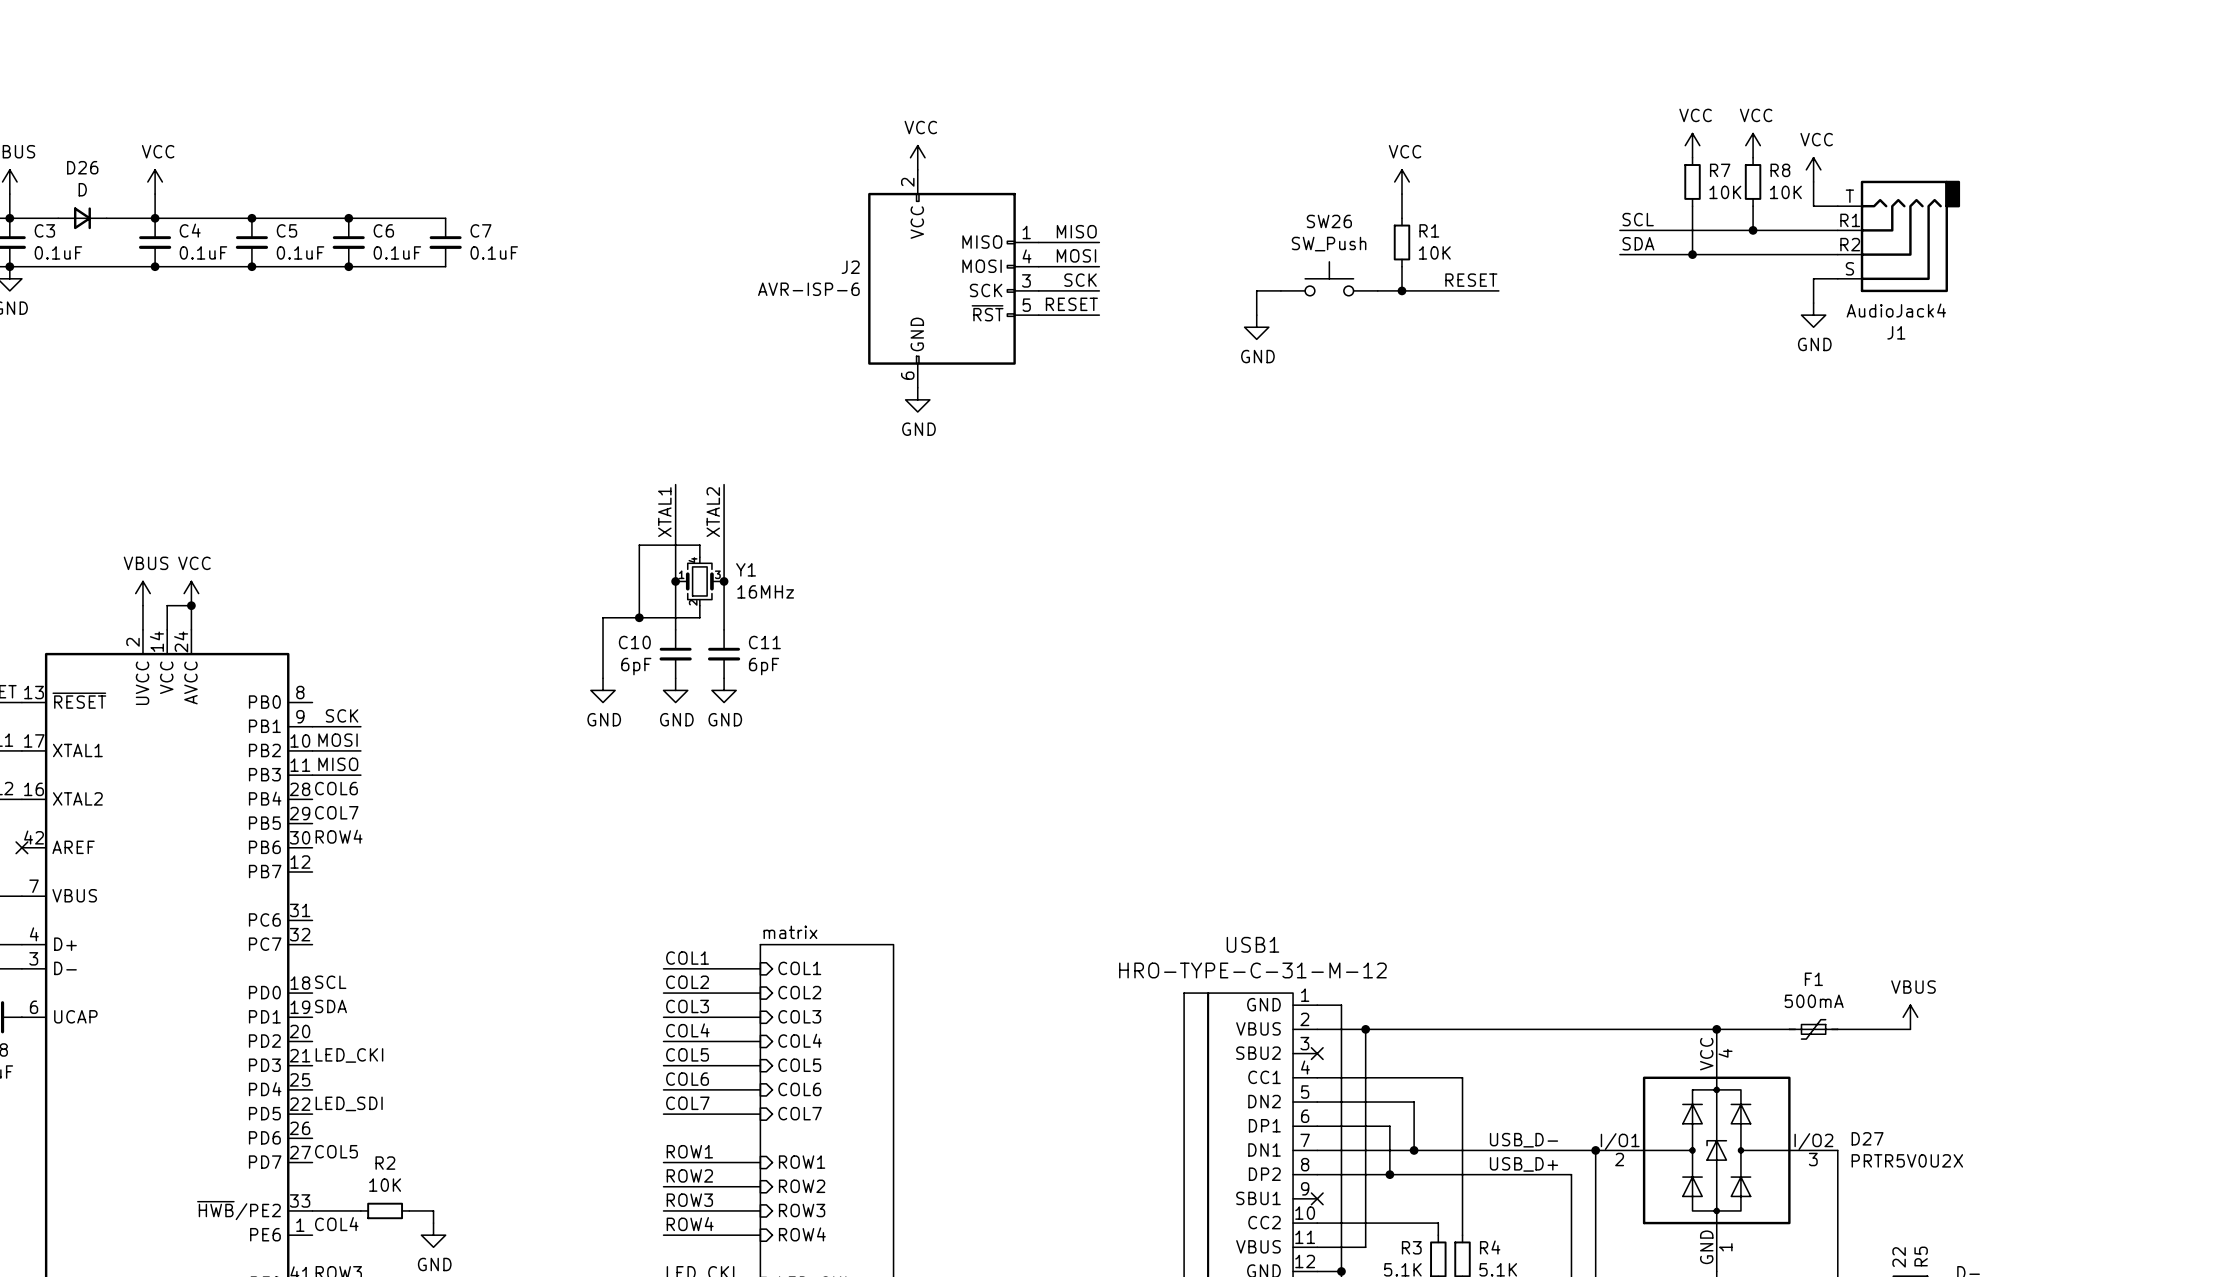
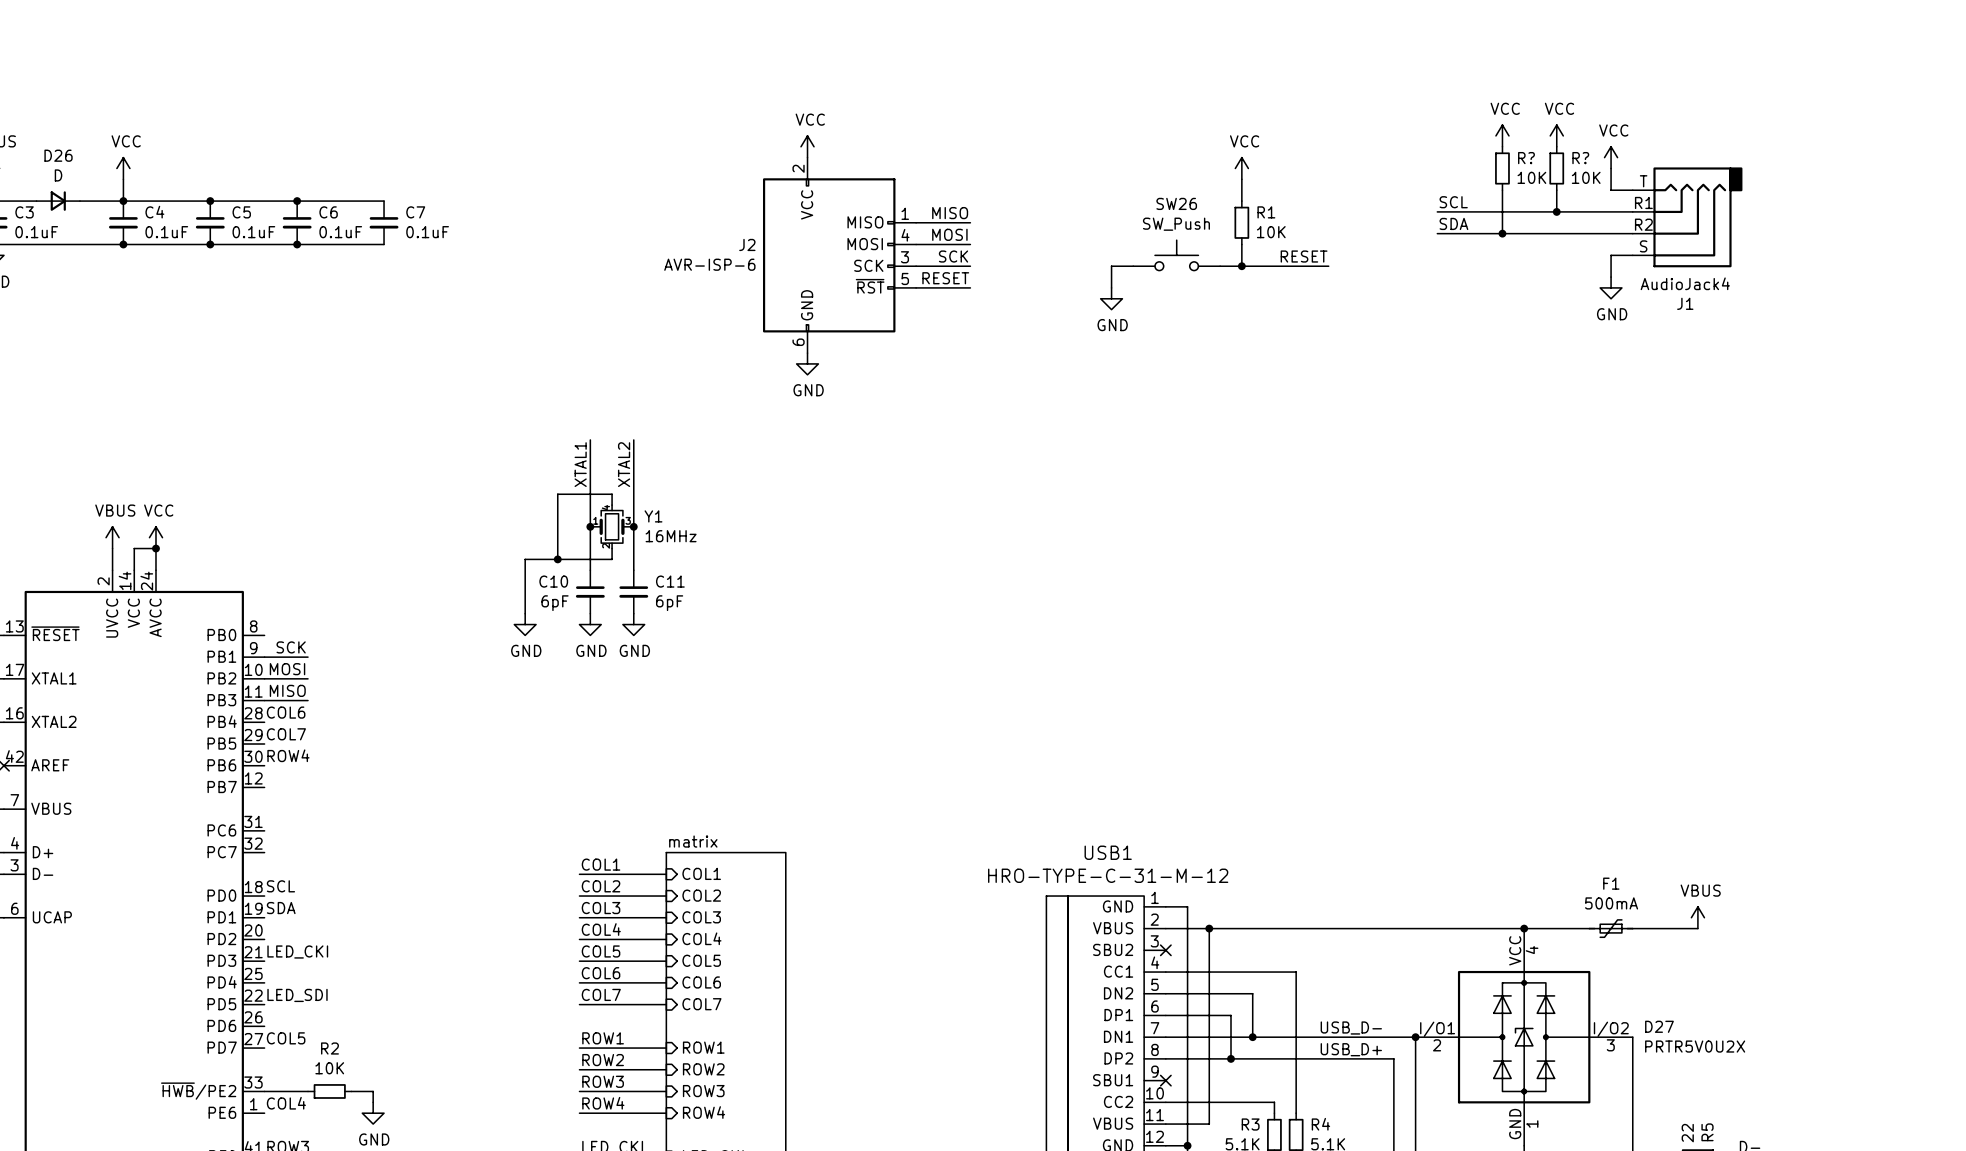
R7 name: R7 (1720, 170) -> R? (1526, 158)
R8 name: R8 (1780, 170) -> R? (1580, 158)

